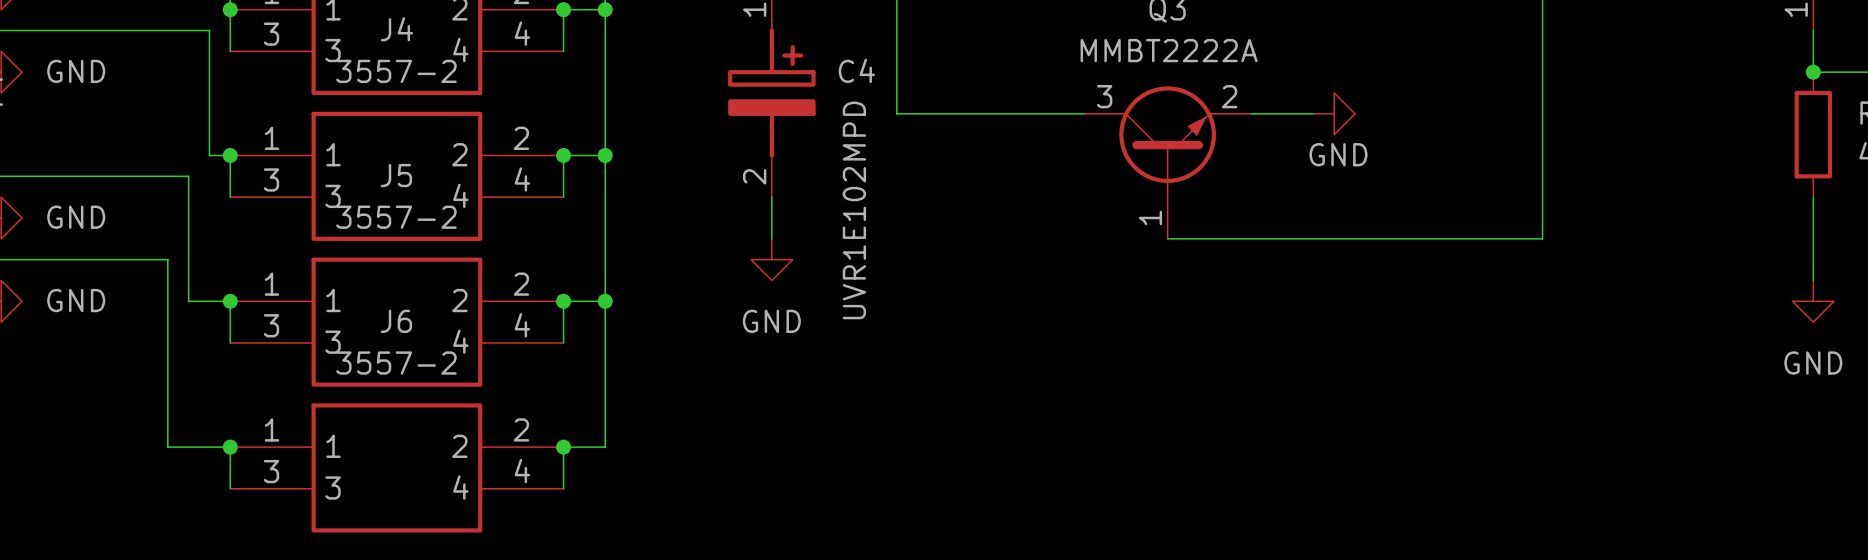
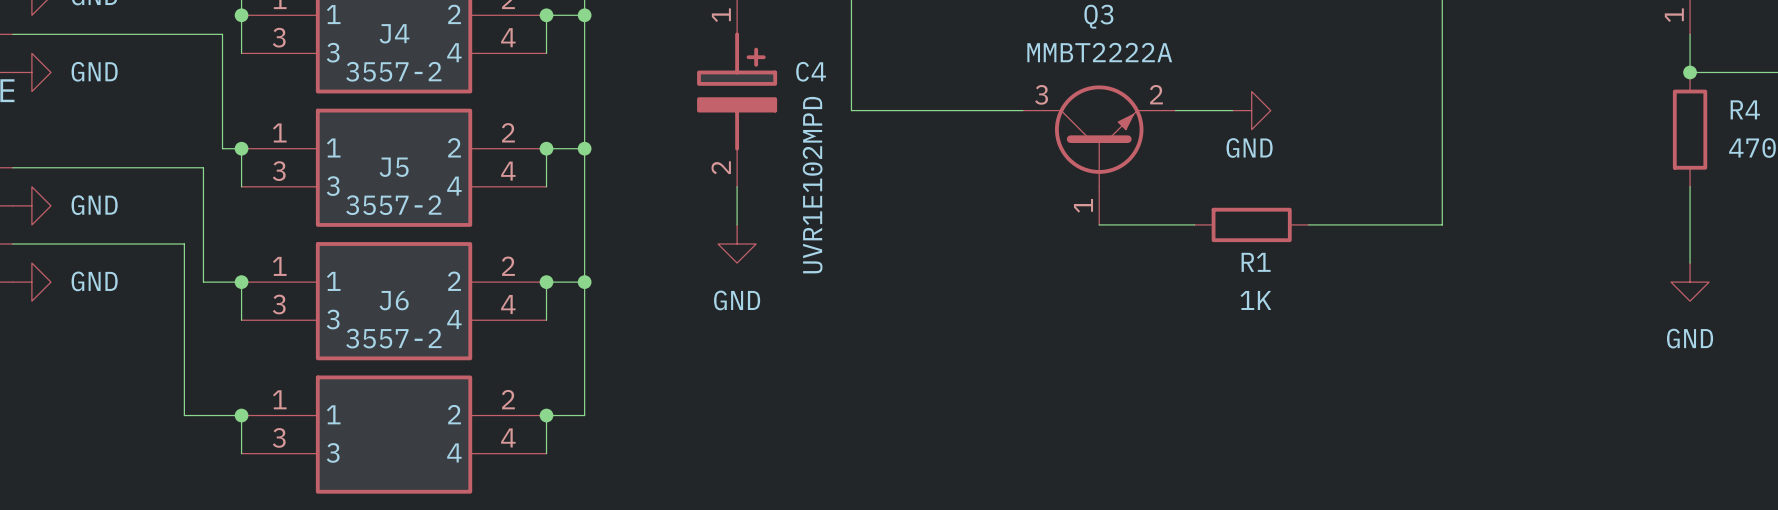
wire: (1271, 238) (1396, 238) -> none
R1: none -> 1K (1251, 224)

